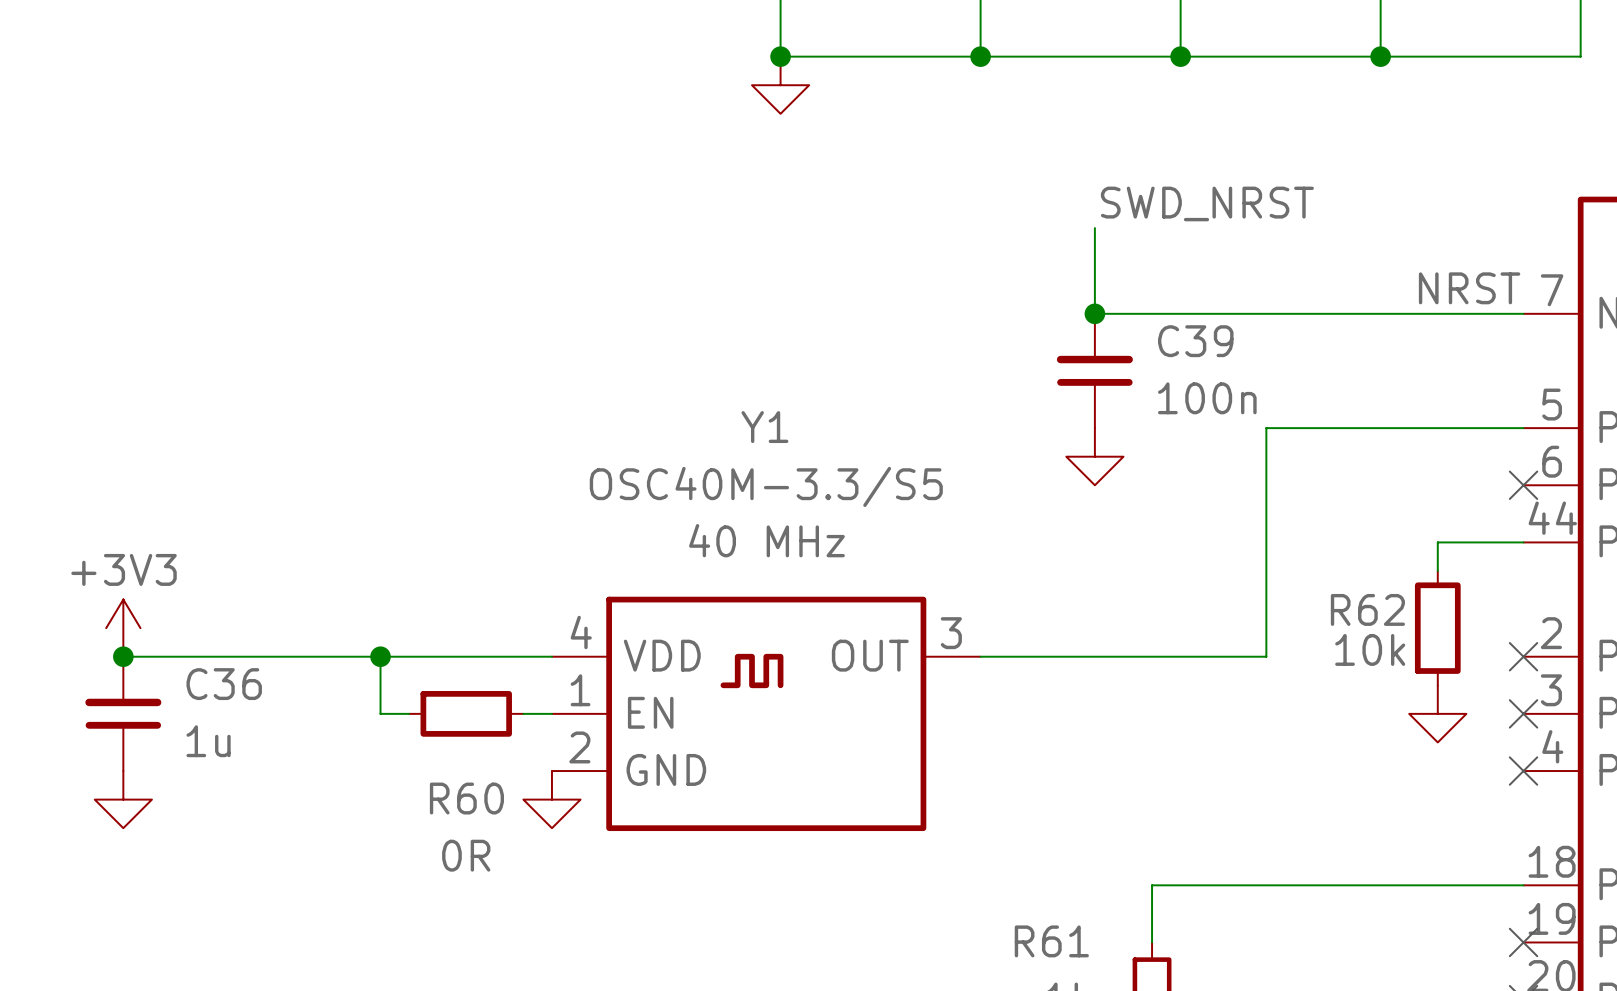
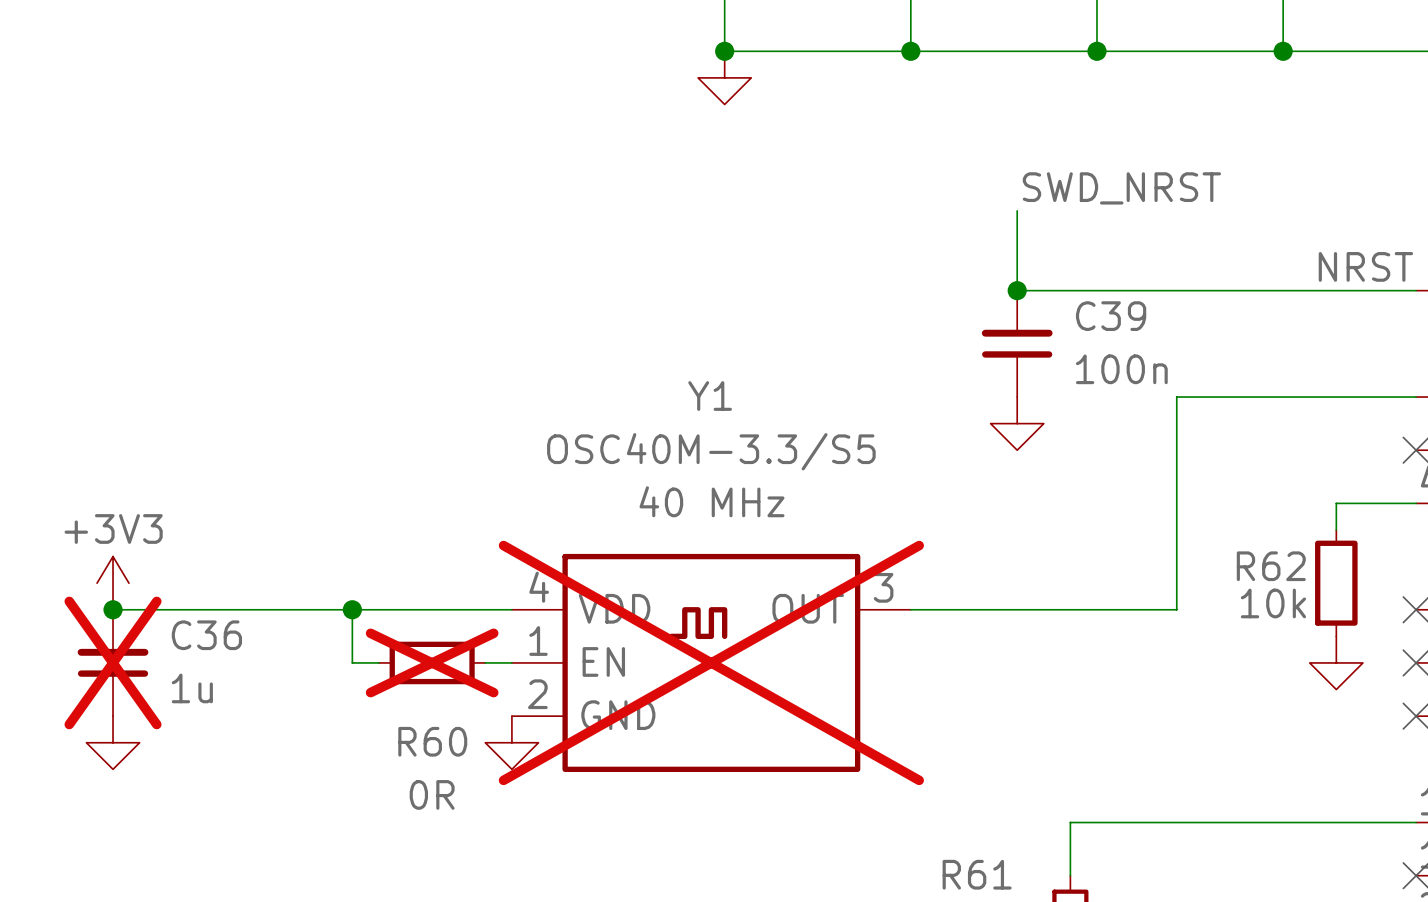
C36 do-not-place cross: none -> (113, 662)
R60 do-not-place cross: none -> (432, 662)
Y1 do-not-place cross: none -> (711, 662)

